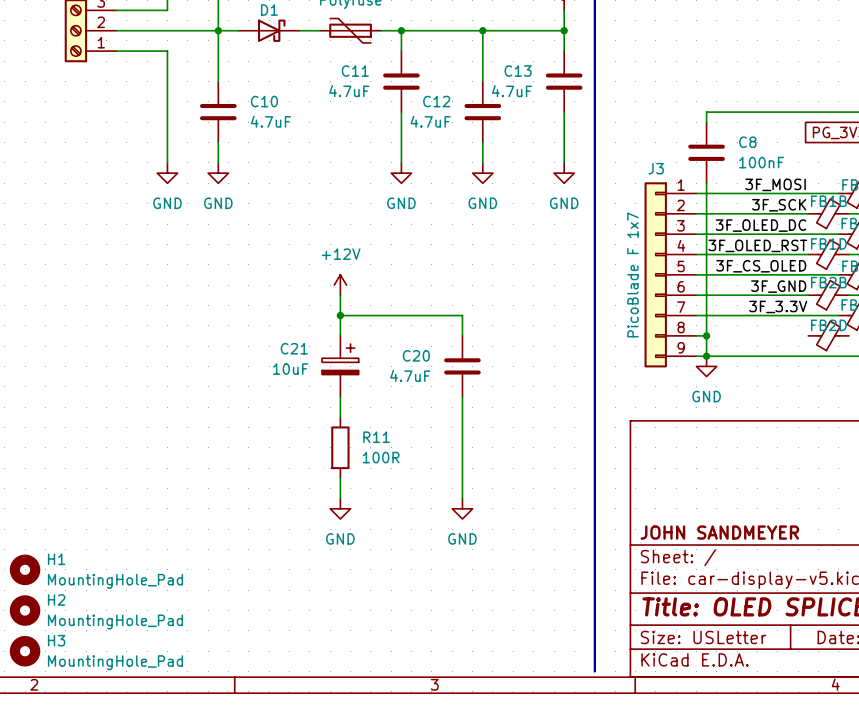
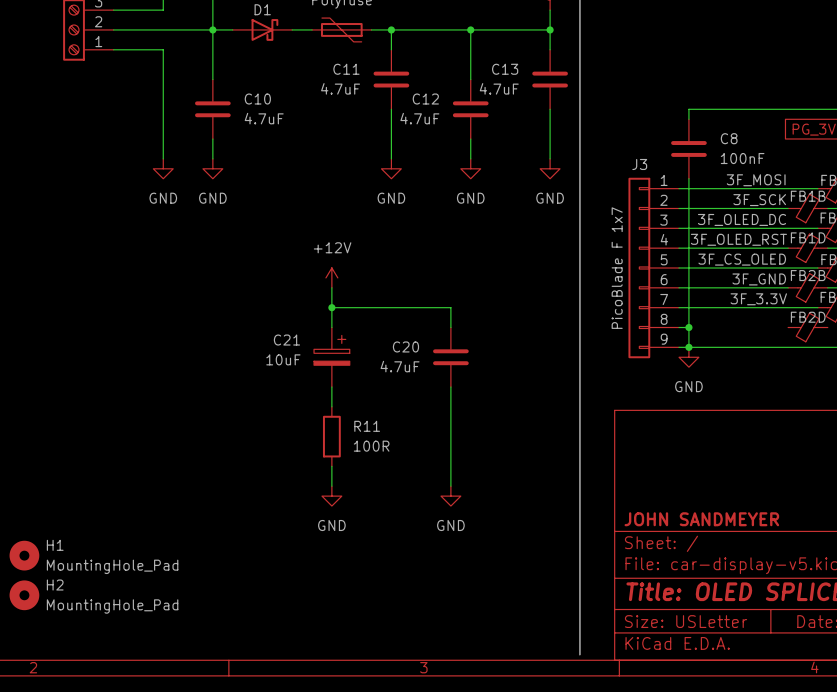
H3: MountingHole_Pad (25, 651) -> none

